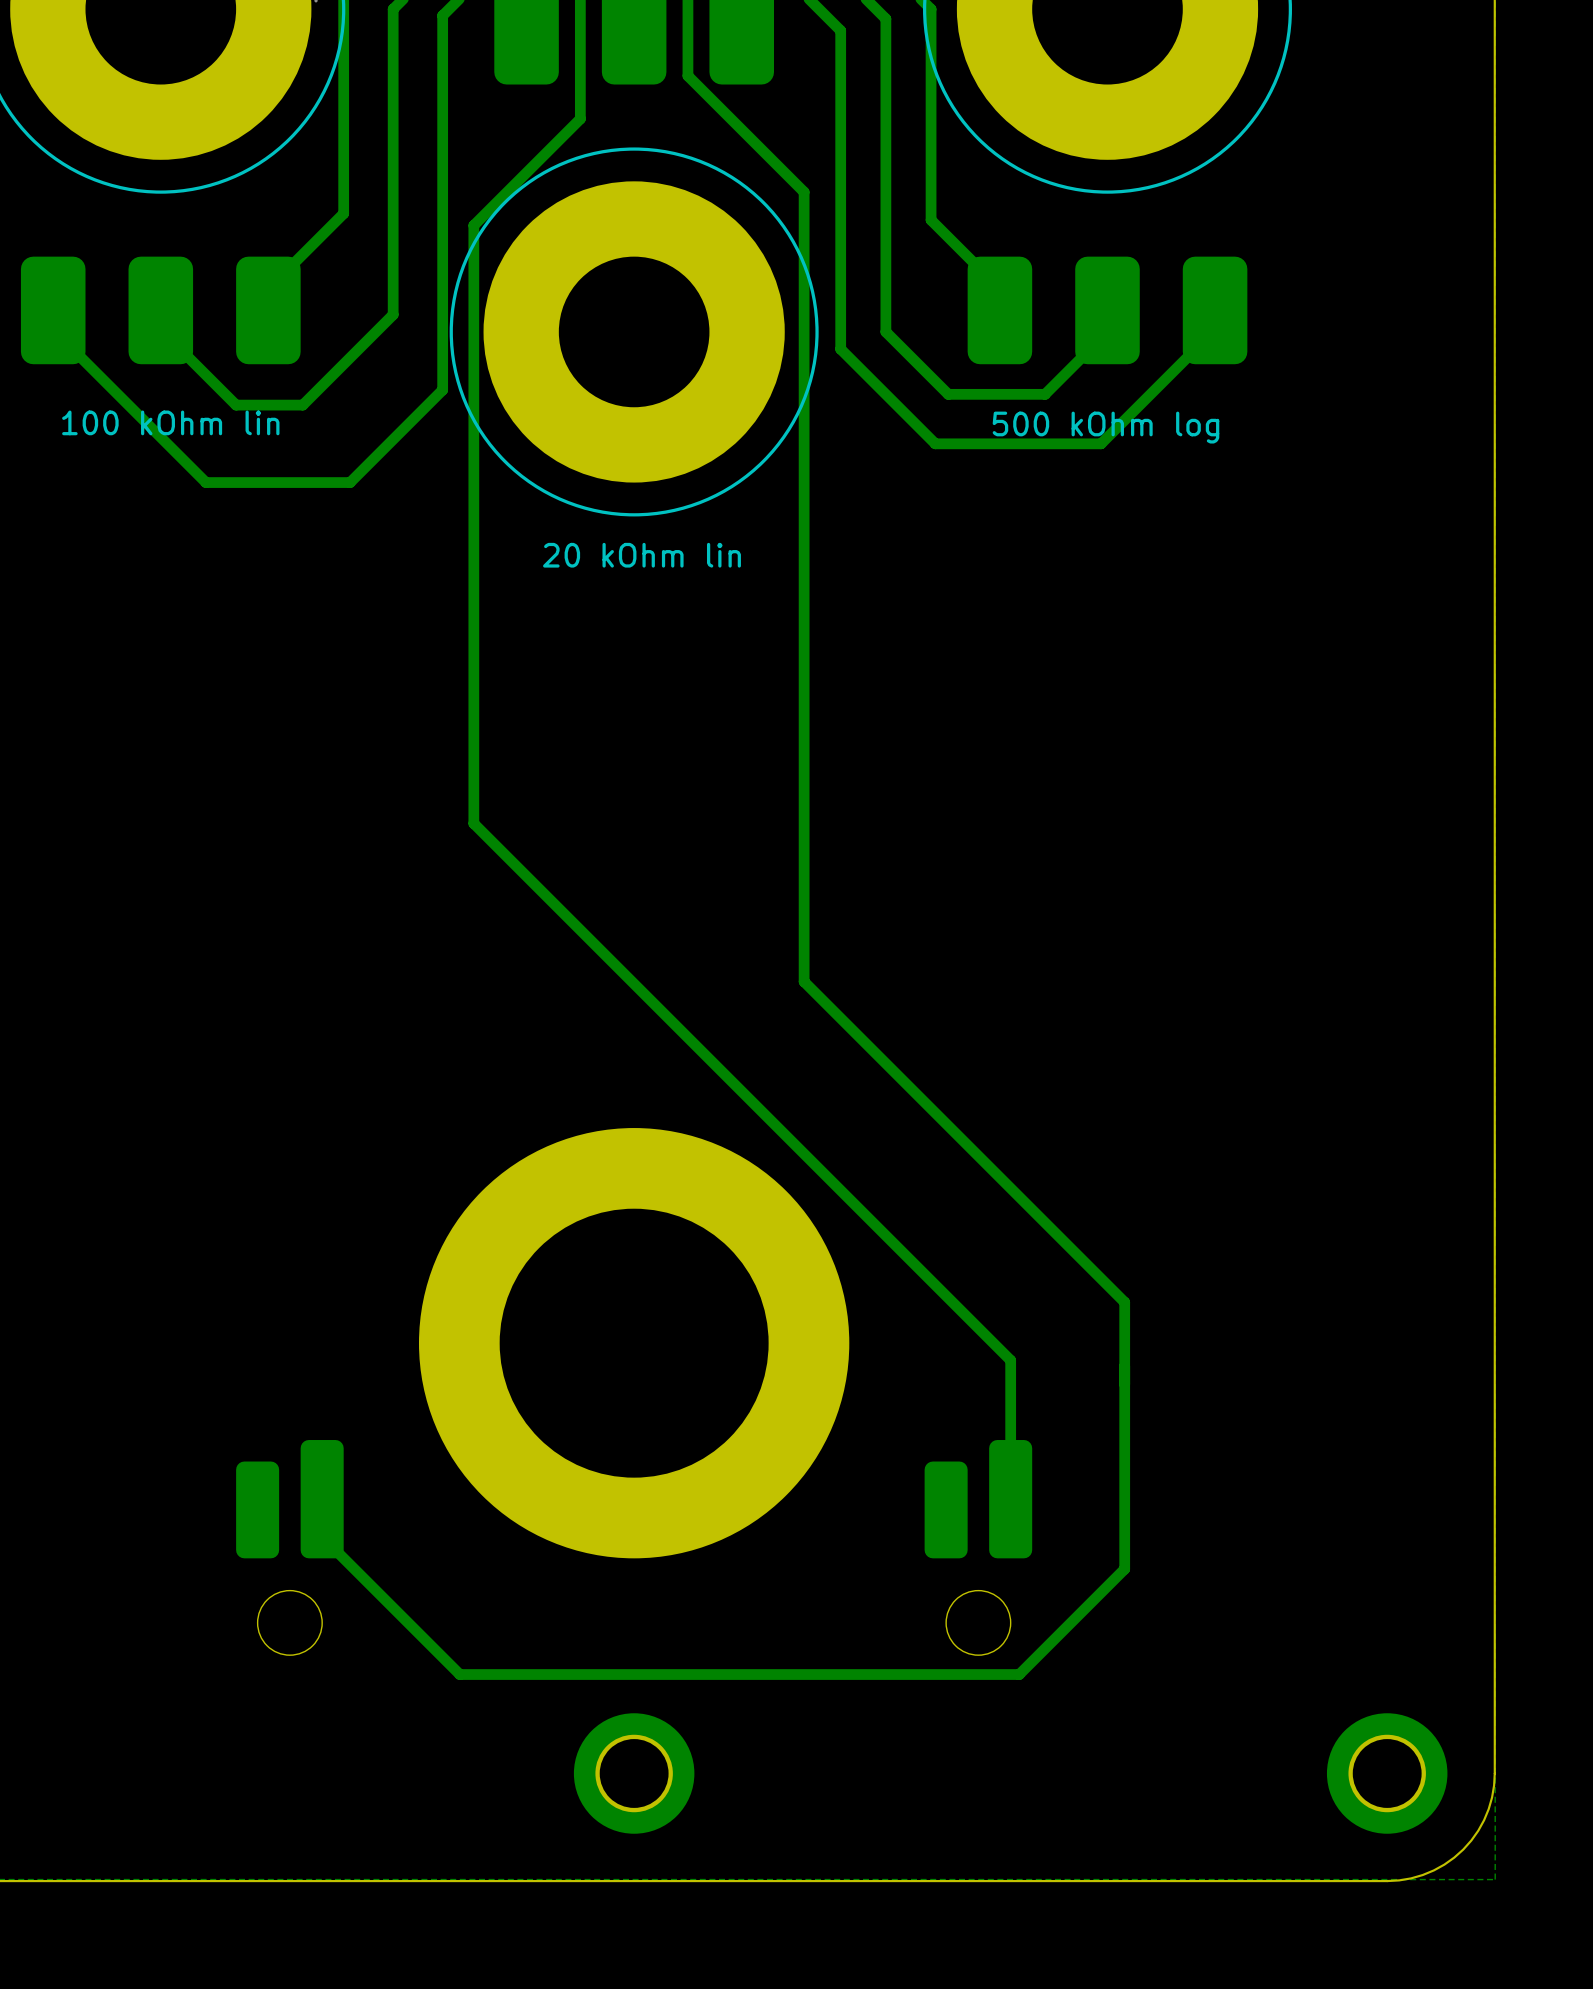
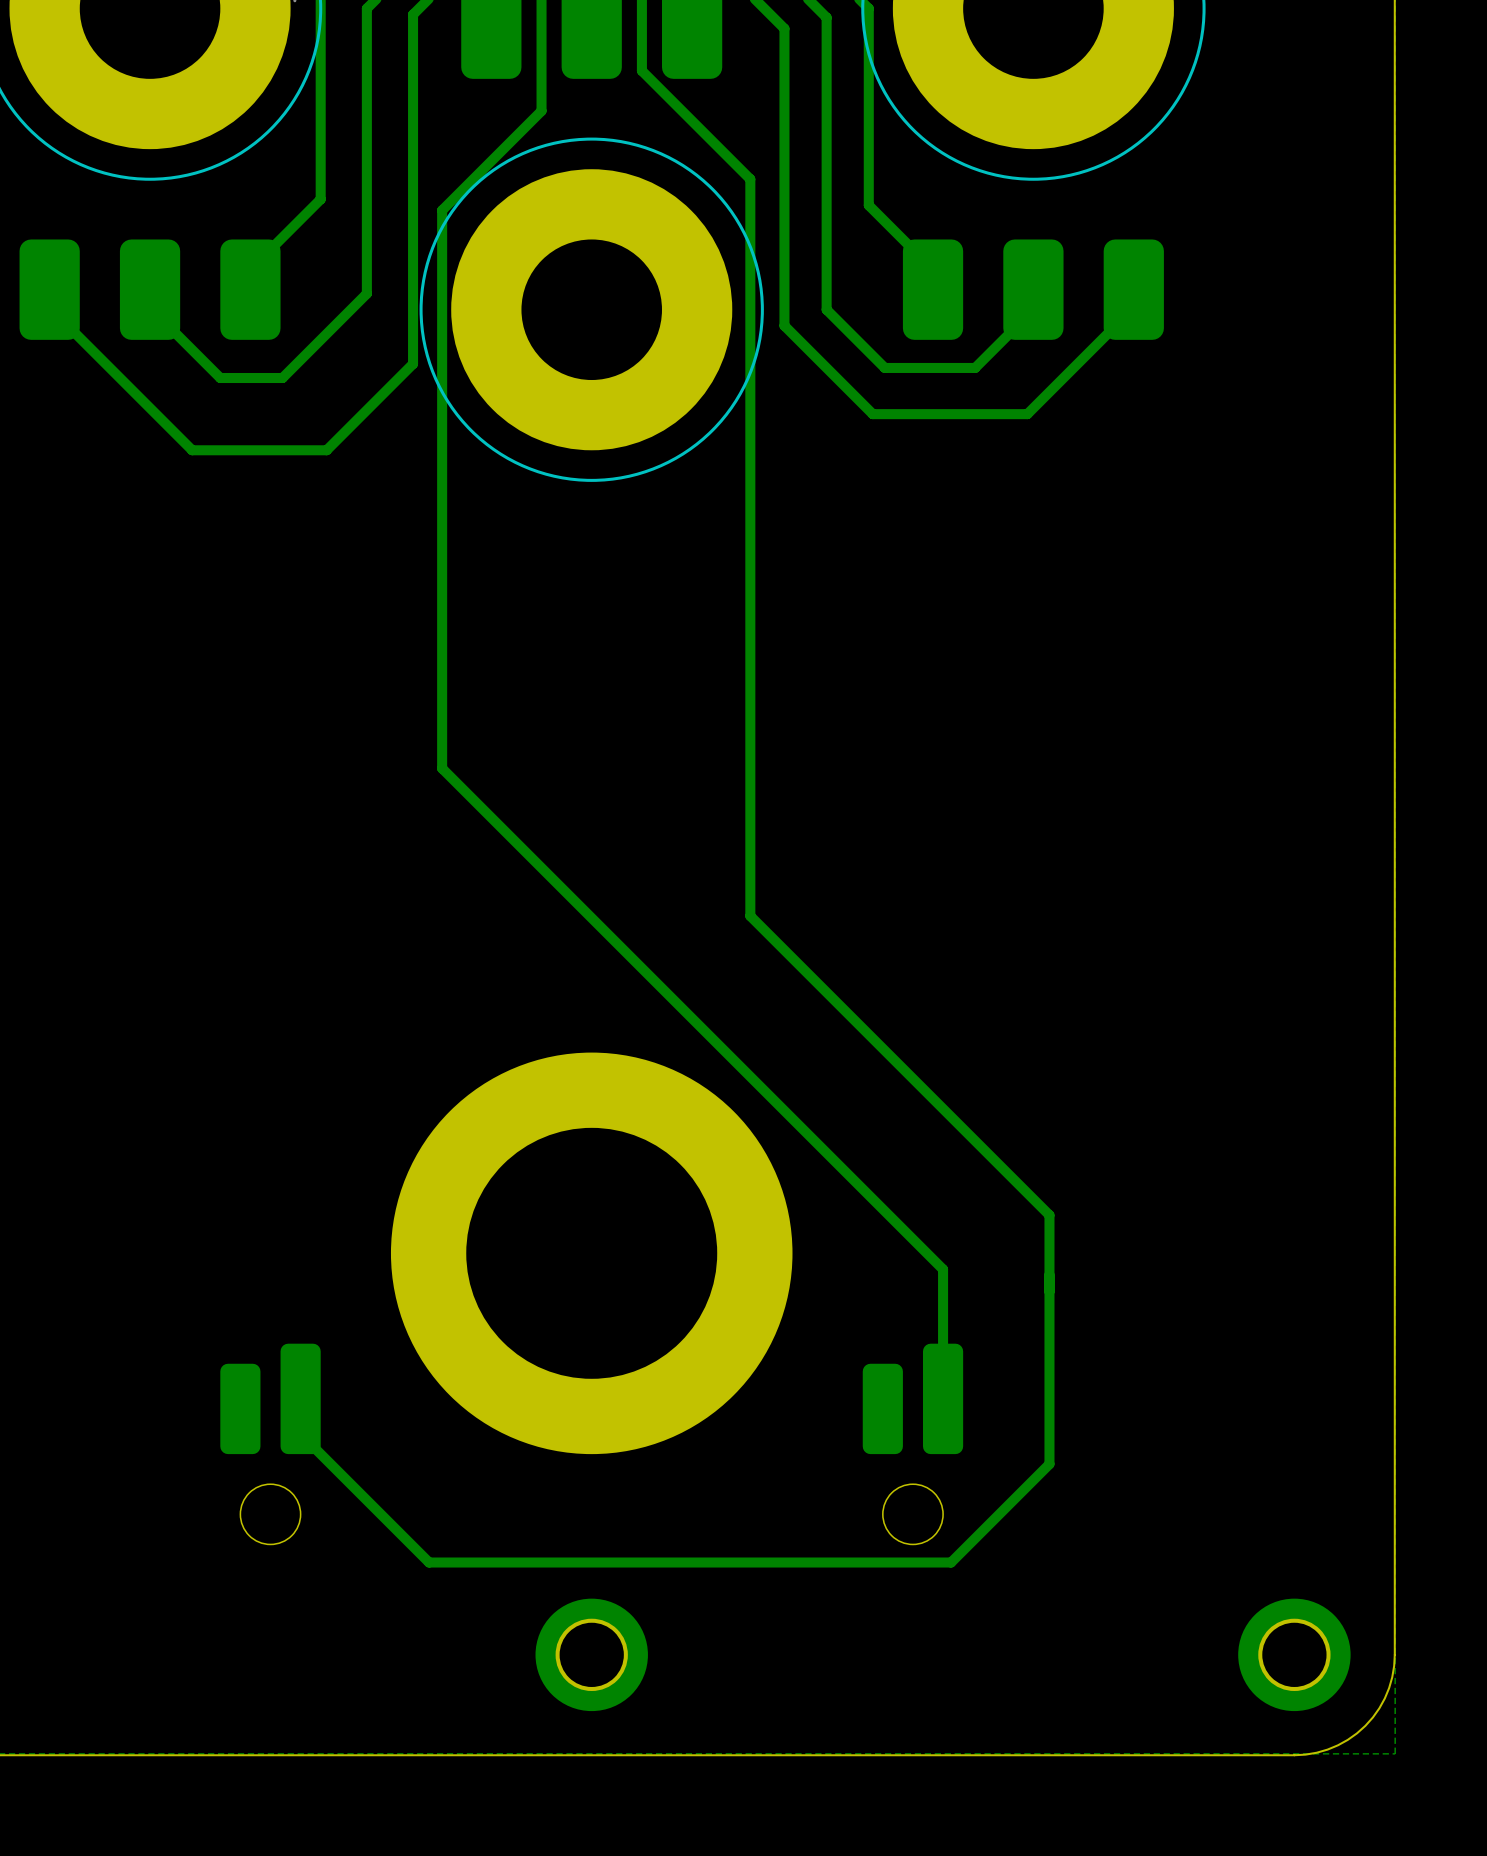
text: 100 kOhm lin (170, 422) -> none
text: 500 kOhm log (1105, 427) -> none
text: 20 kOhm lin (642, 555) -> none

